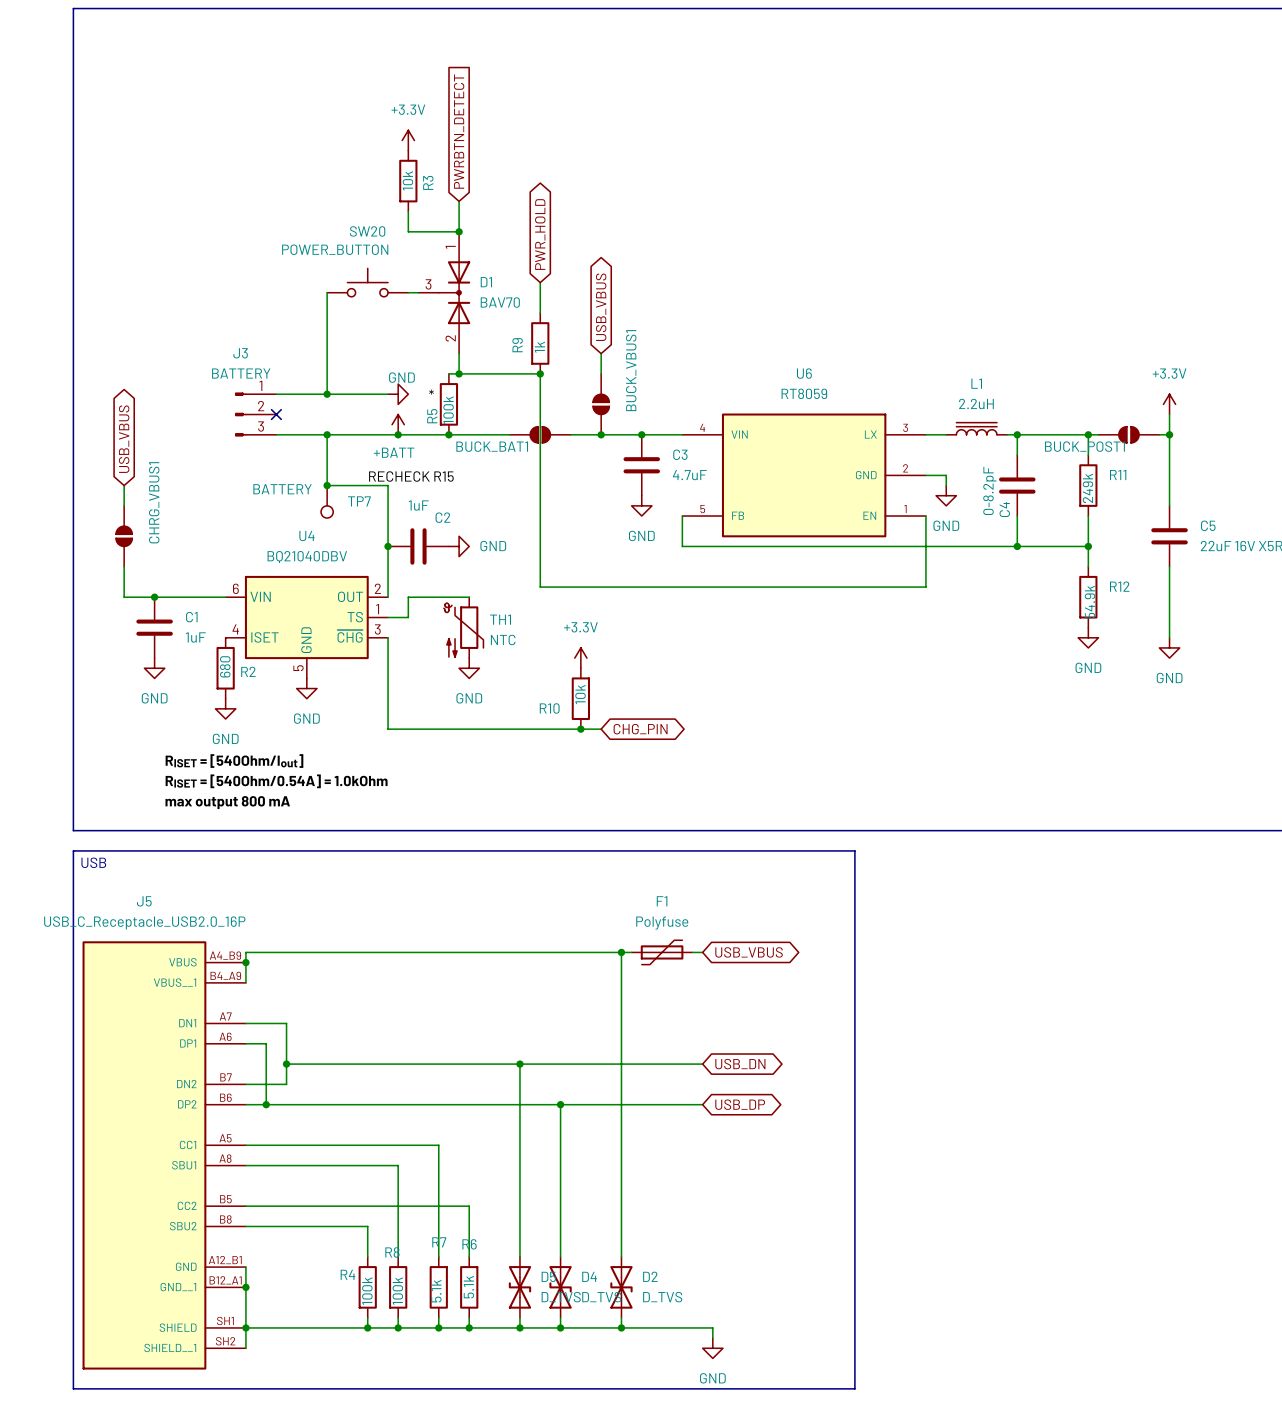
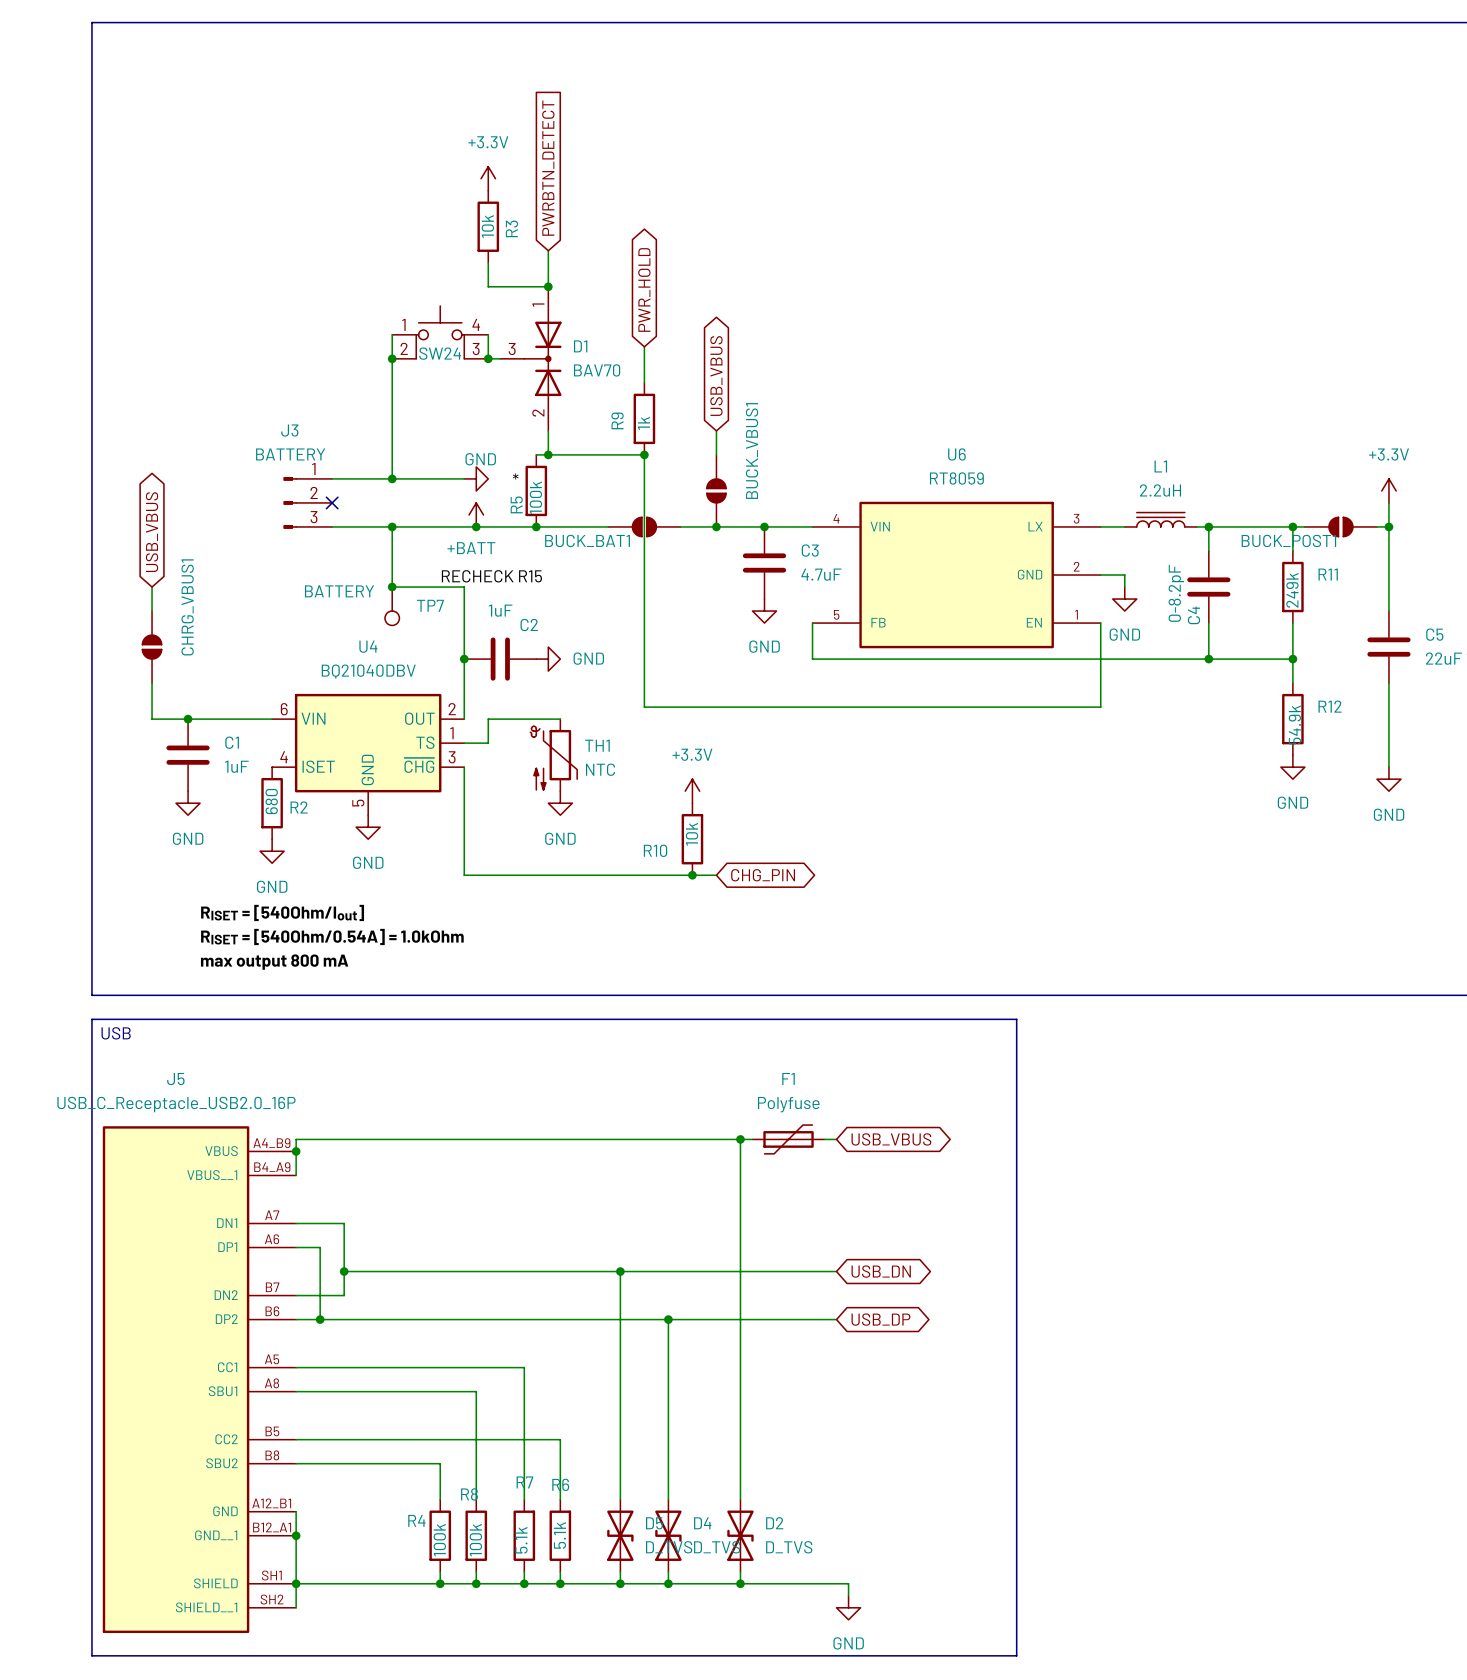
SW24: none -> (440, 332)
wire: none -> (392, 334) (392, 358)
wire: none -> (488, 334) (488, 358)
SW20: POWER_BUTTON (367, 282) -> none
junction: none -> (392, 358)
junction: none -> (488, 358)

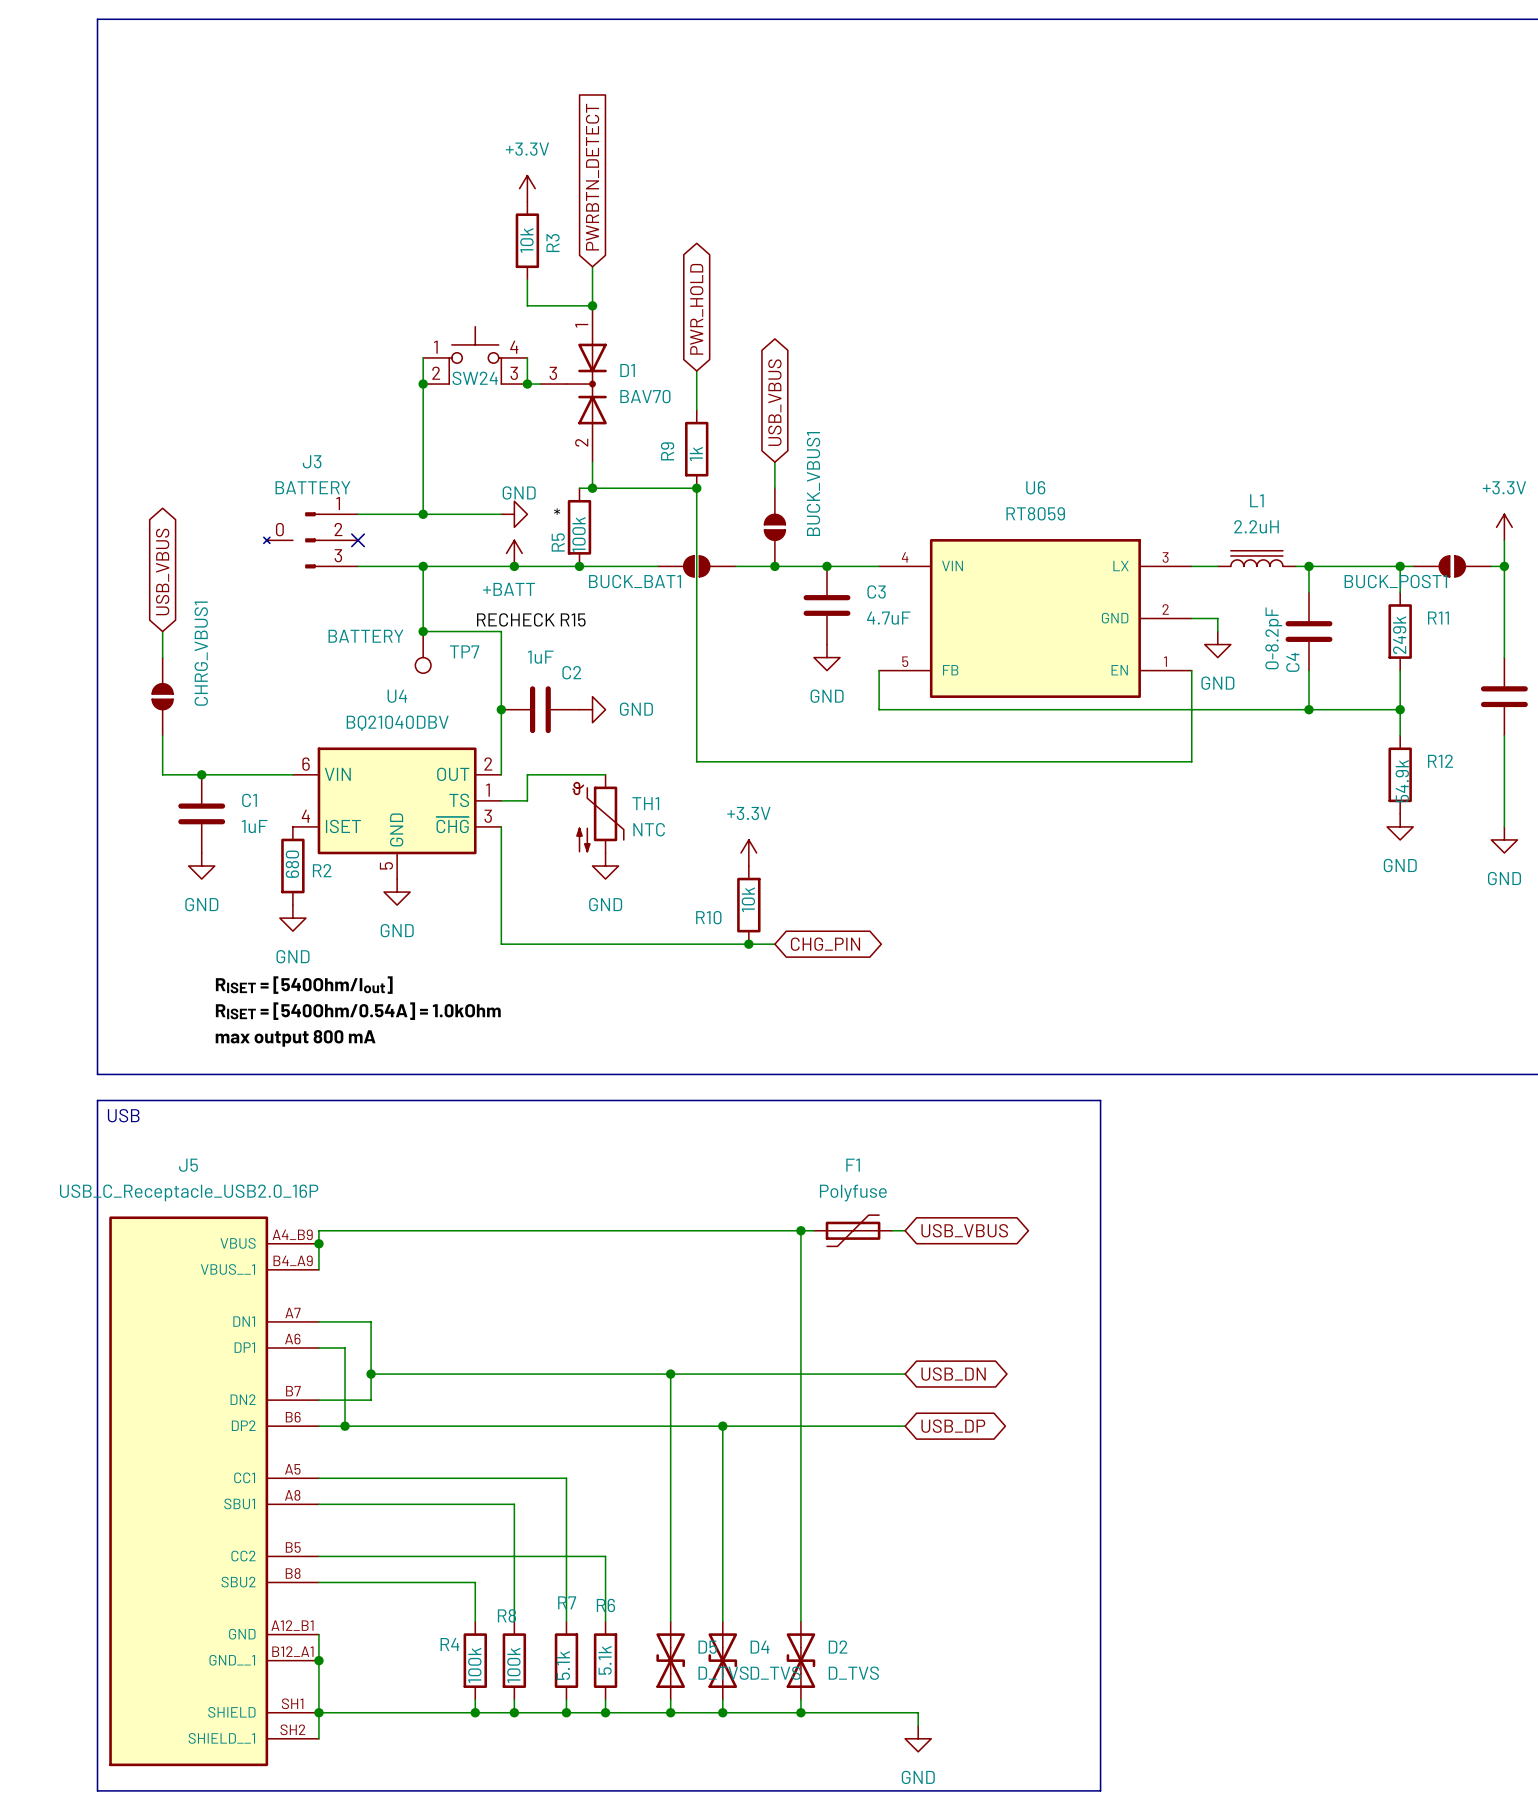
J3 symbol: [283, 477, 333, 529] -> [263, 512, 359, 569]

